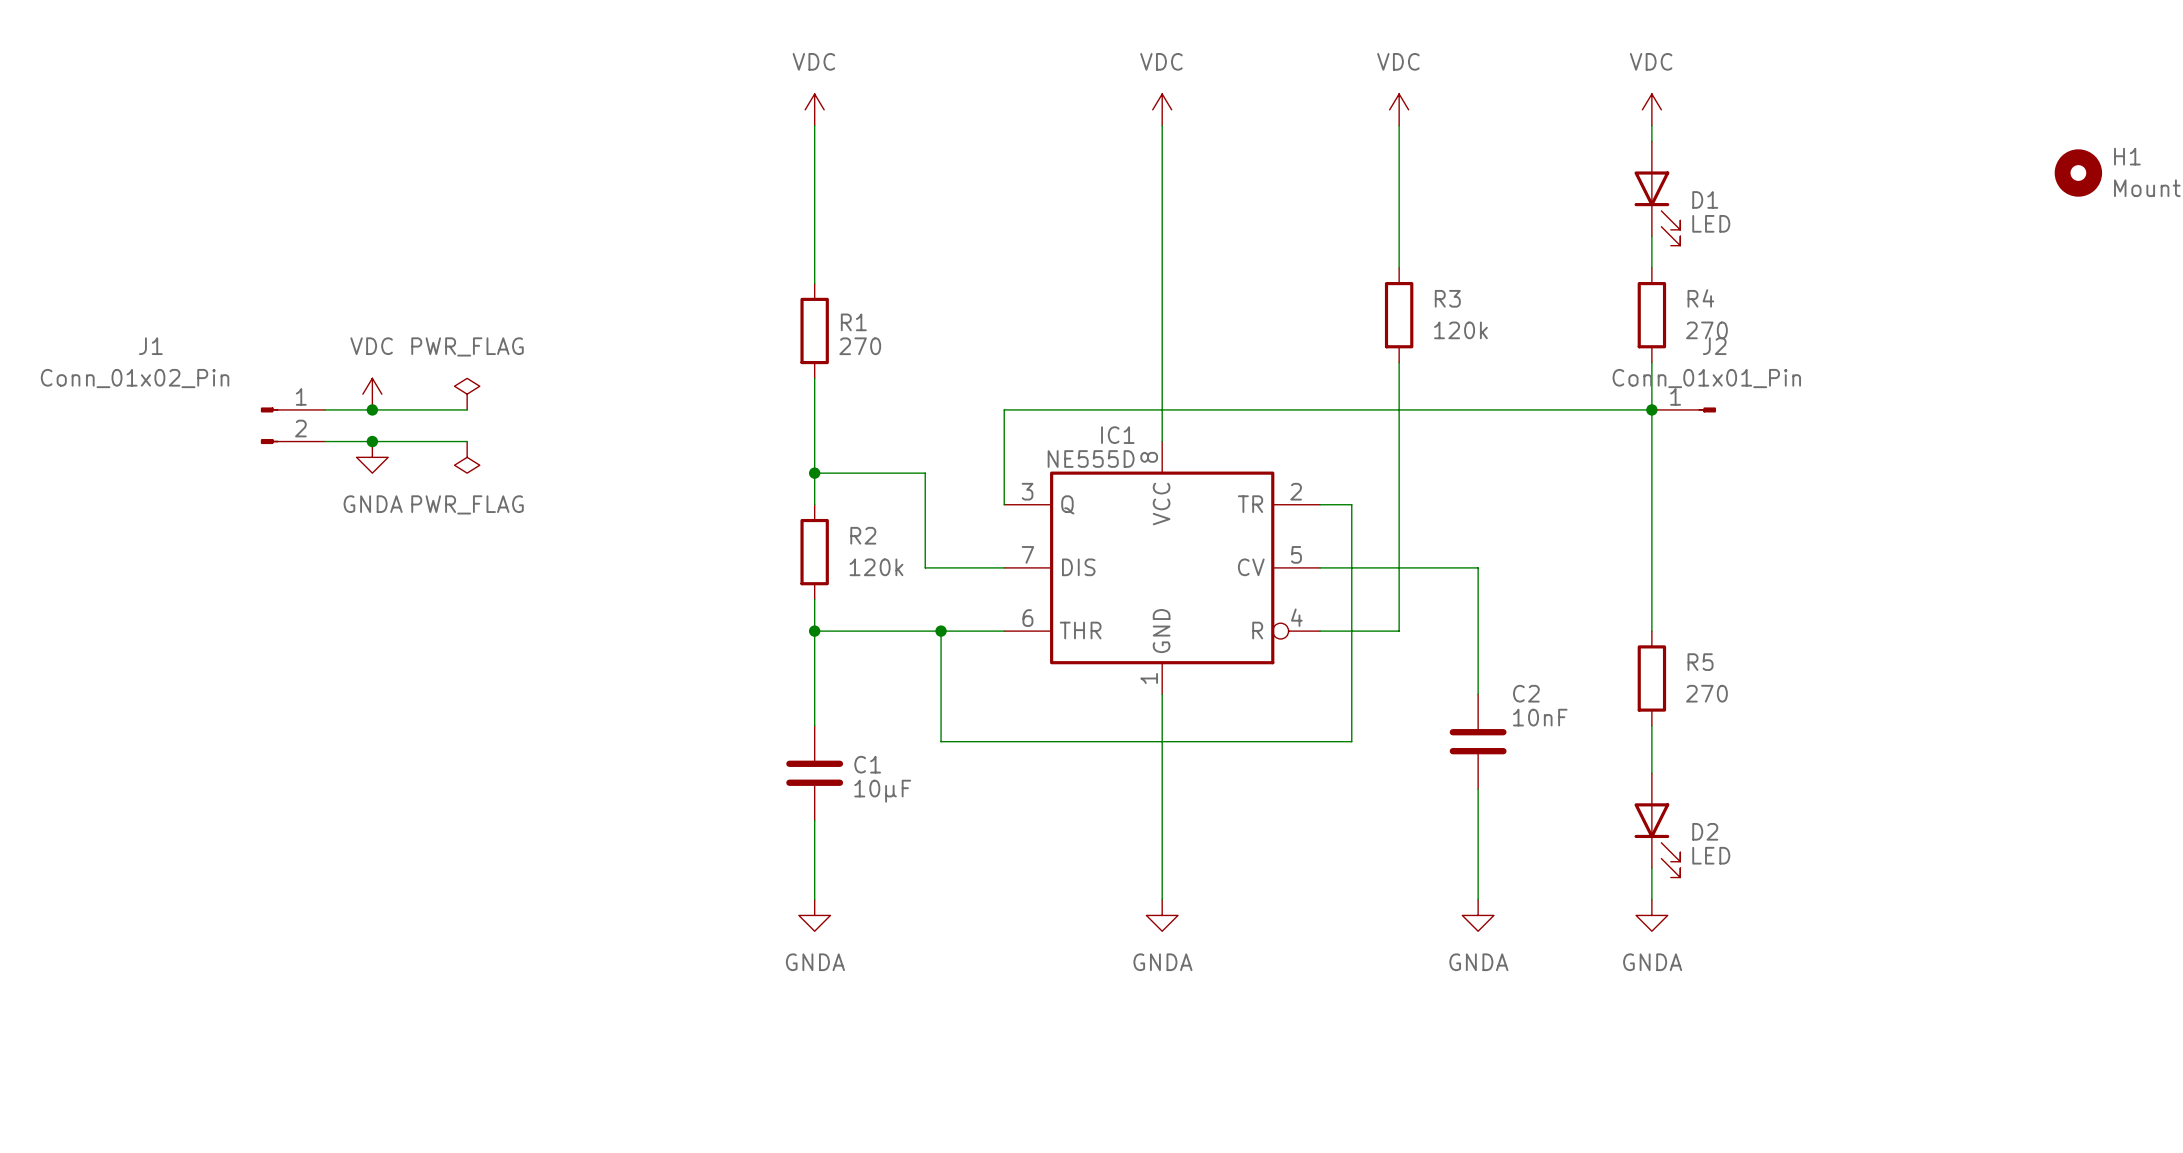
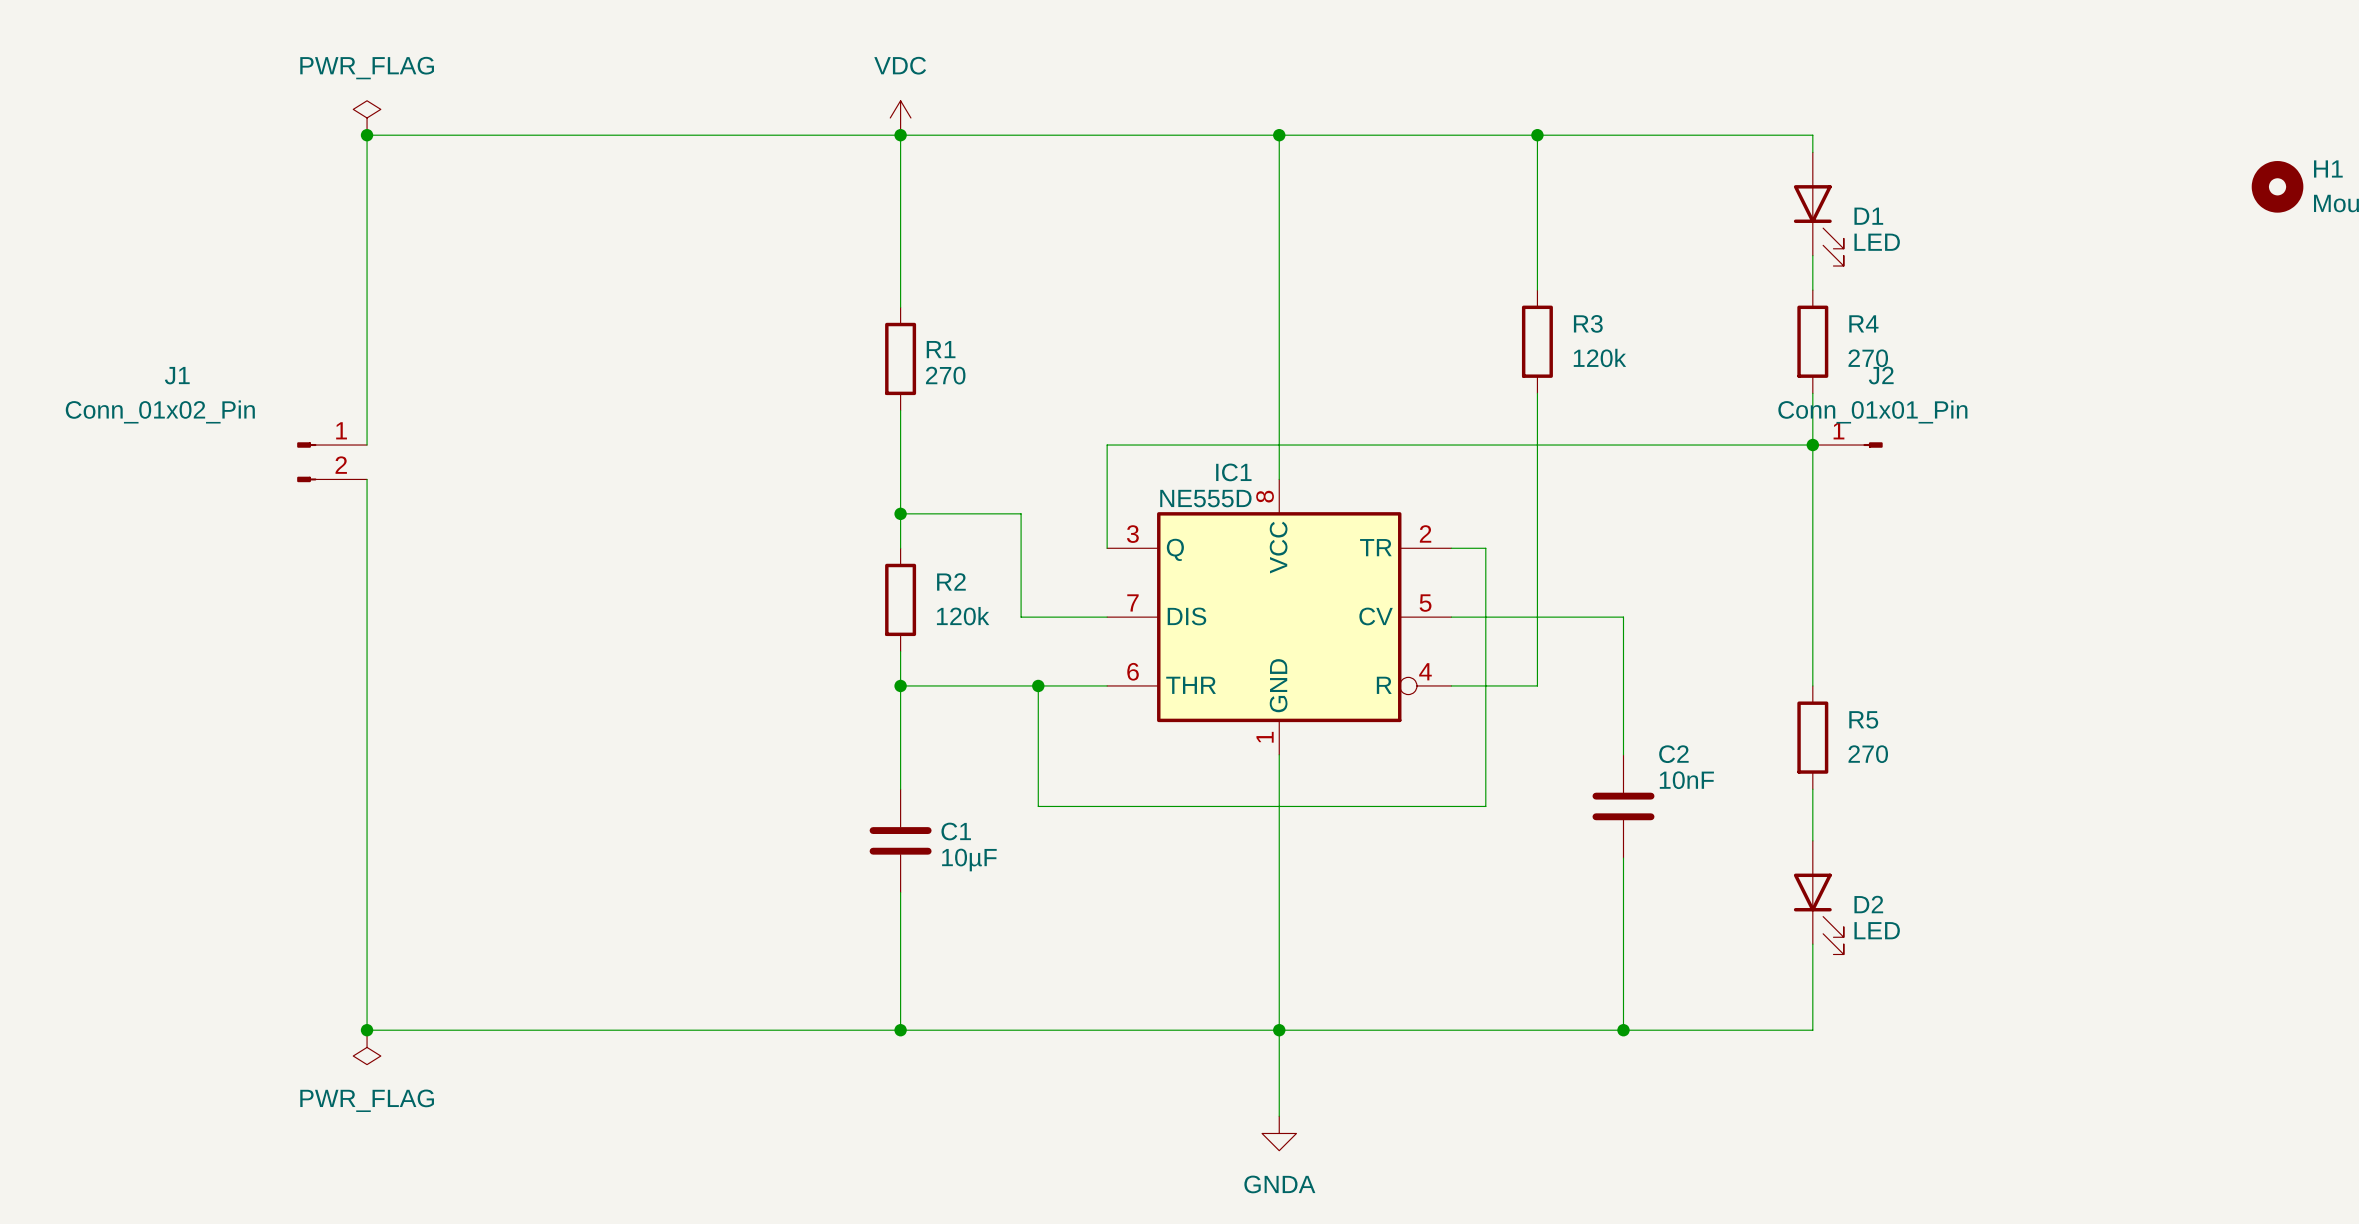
power symbol: none -> PWR_FLAG (367, 117)
power symbol: VDC (1162, 109) -> none
power symbol: VDC (1399, 109) -> none
power symbol: VDC (1651, 109) -> none
junction: none -> (367, 135)
junction: none -> (900, 135)
junction: none -> (1279, 135)
junction: none -> (1537, 135)
power symbol: VDC (372, 394) -> none
power symbol: PWR_FLAG (467, 394) -> none
wire: (324, 409) (467, 409) -> (367, 445) (367, 135) (1812, 135)
junction: (372, 409) -> none
wire: (324, 441) (467, 441) -> (367, 479) (367, 1030) (1812, 1030) (1812, 978)
junction: (372, 441) -> none
power symbol: GNDA (372, 457) -> none
power symbol: PWR_FLAG (467, 457) -> none
wire: none -> (900, 978) (900, 1030)
wire: none -> (1279, 978) (1279, 1116)
wire: none -> (1623, 978) (1623, 1030)
power symbol: GNDA (814, 915) -> none
power symbol position: GNDA (1162, 915) -> GNDA (1279, 1133)
power symbol: GNDA (1478, 915) -> none
power symbol: GNDA (1651, 915) -> none
junction: none -> (367, 1030)
junction: none -> (900, 1030)
junction: none -> (1279, 1030)
junction: none -> (1623, 1030)
power symbol: none -> PWR_FLAG (367, 1047)

